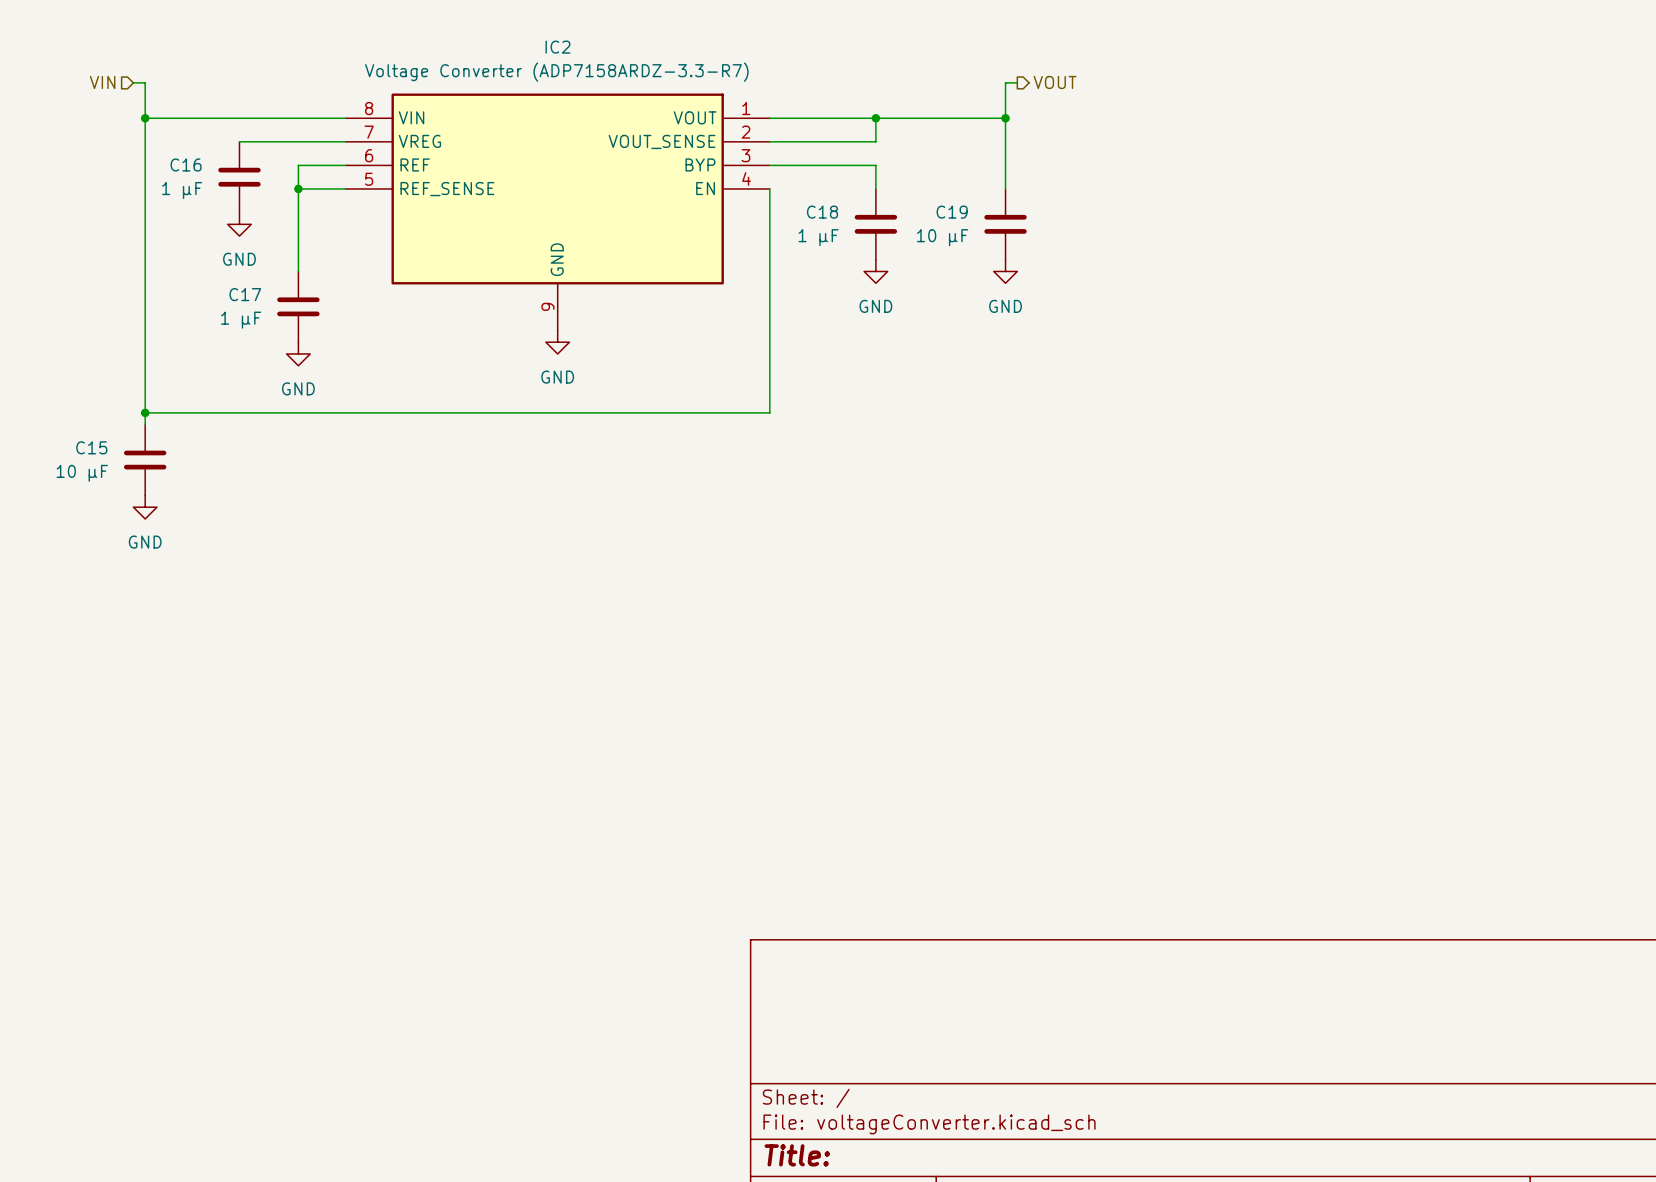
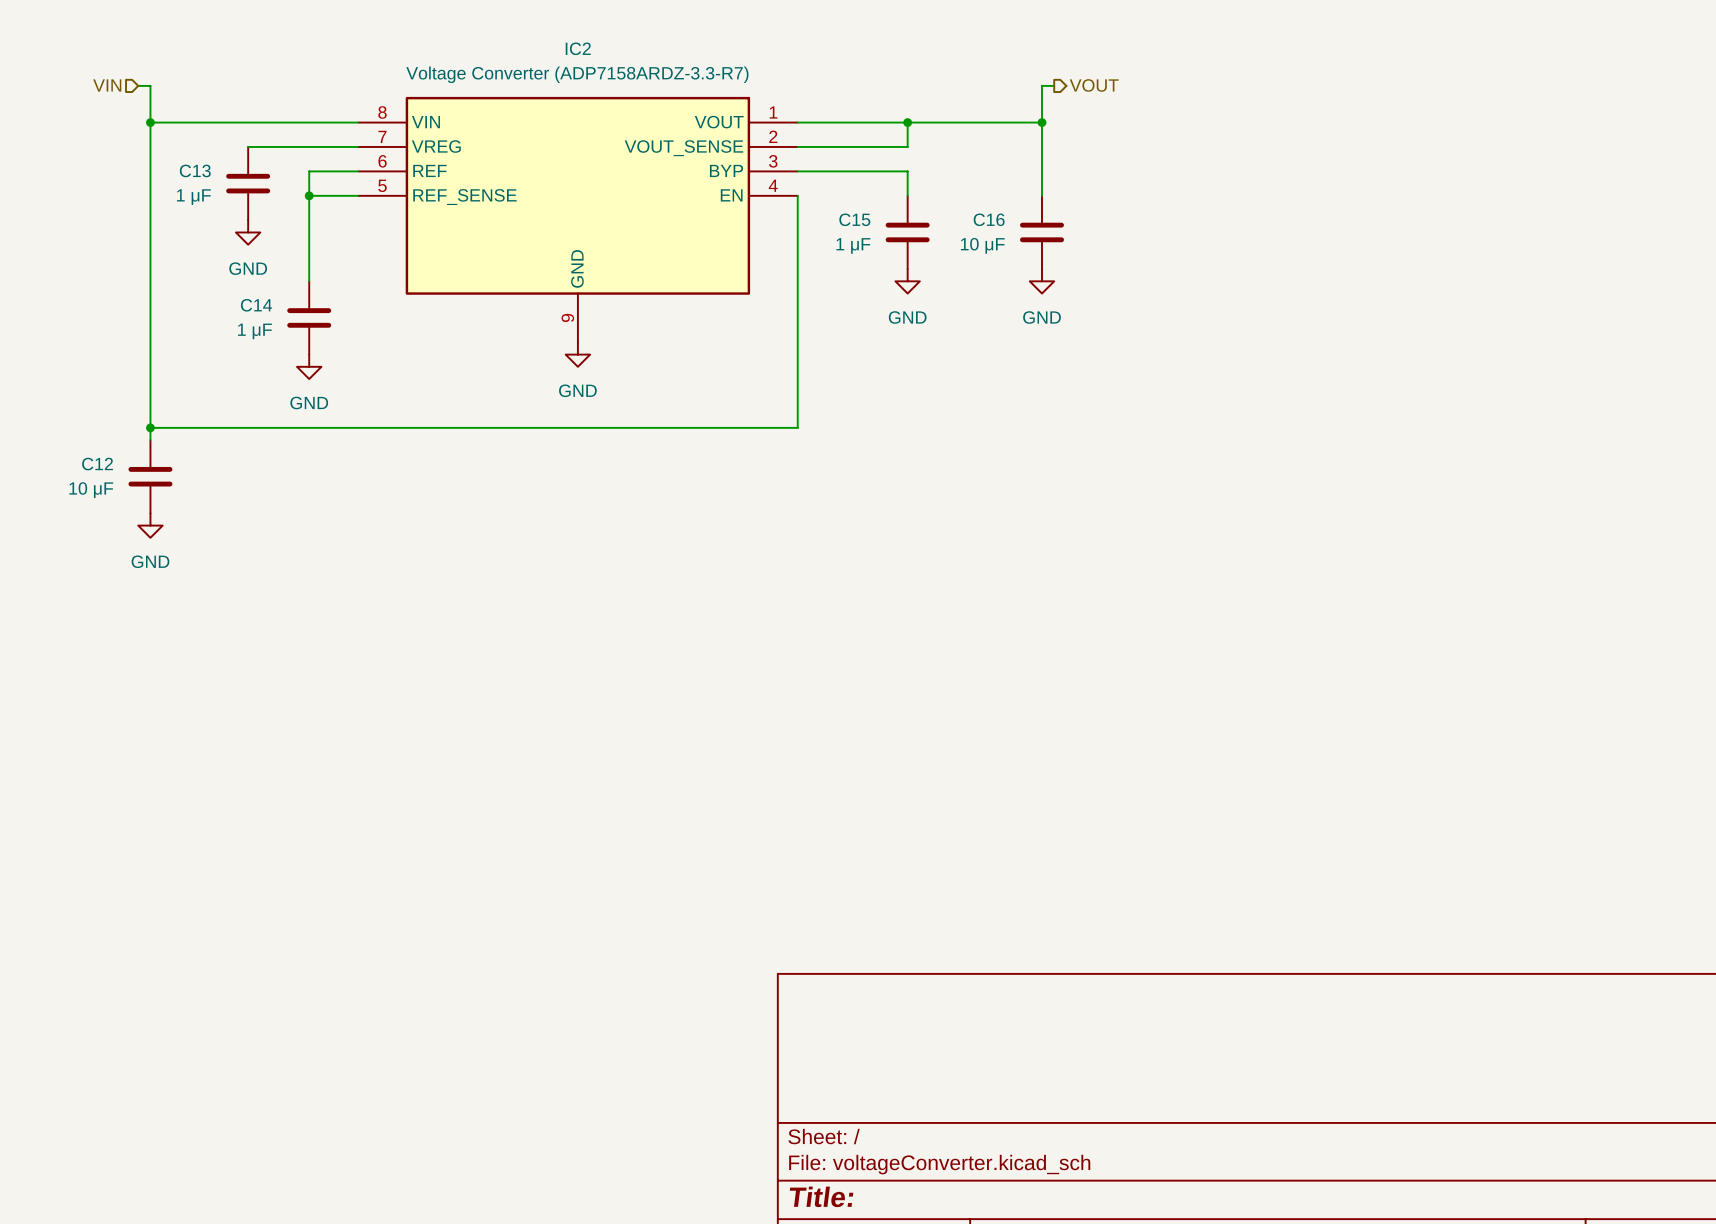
C16 name: C16 (186, 164) -> C13 (195, 170)
C18 name: C18 (822, 212) -> C15 (854, 219)
C19 name: C19 (952, 212) -> C16 (989, 219)
C17 name: C17 (245, 294) -> C14 (256, 305)
C15 name: C15 (91, 447) -> C12 (97, 464)

